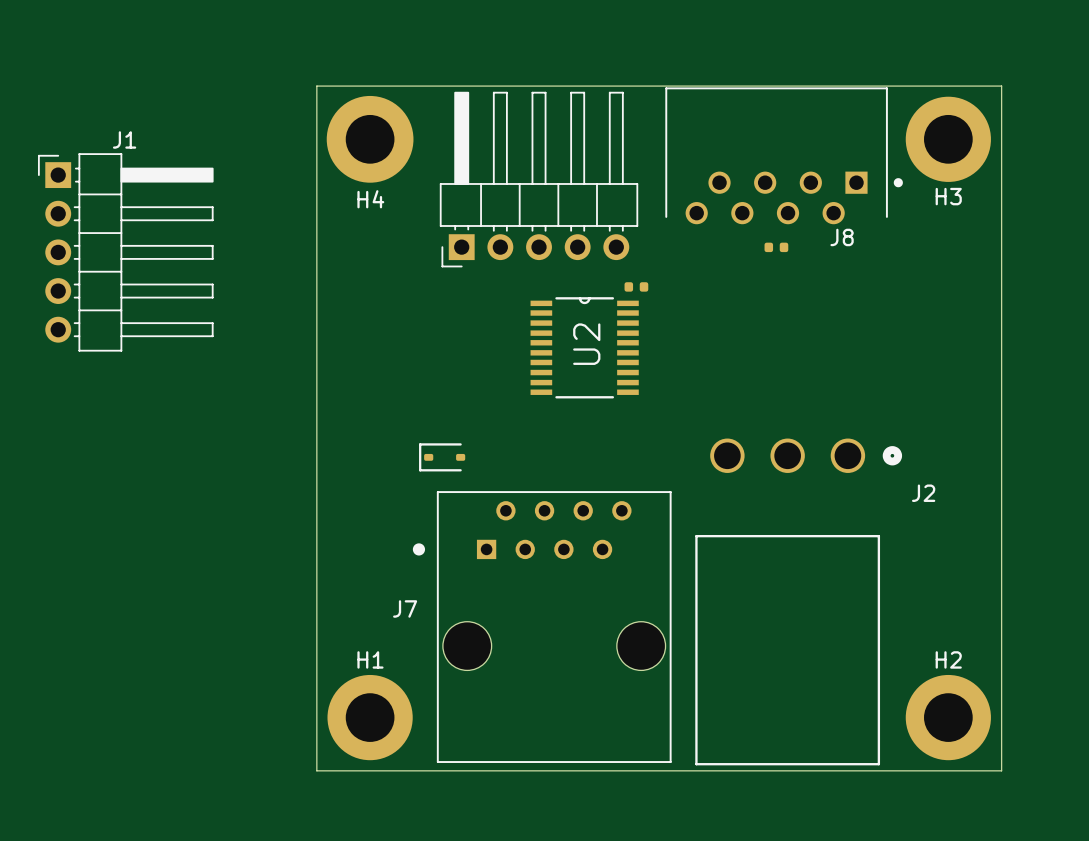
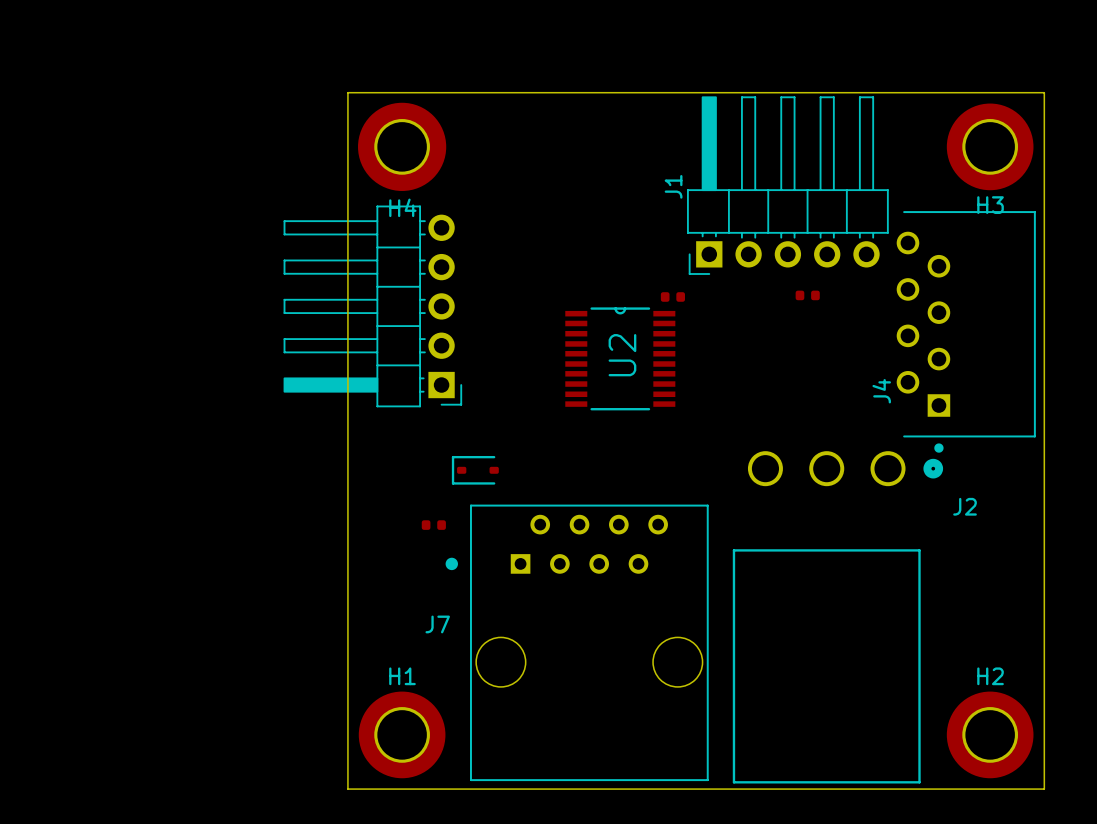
J8: (784, 155) -> none
part rotation: 0° (539, 179) -> 90° counterclockwise (372, 306)
part position: (539, 179) -> (372, 306)
part position: (776, 247) -> (807, 295)
J1 rotation: 0° (125, 252) -> 90° counterclockwise (787, 185)
J1 position: (125, 252) -> (787, 185)
J4: none -> (966, 331)
part: none -> (433, 525)

